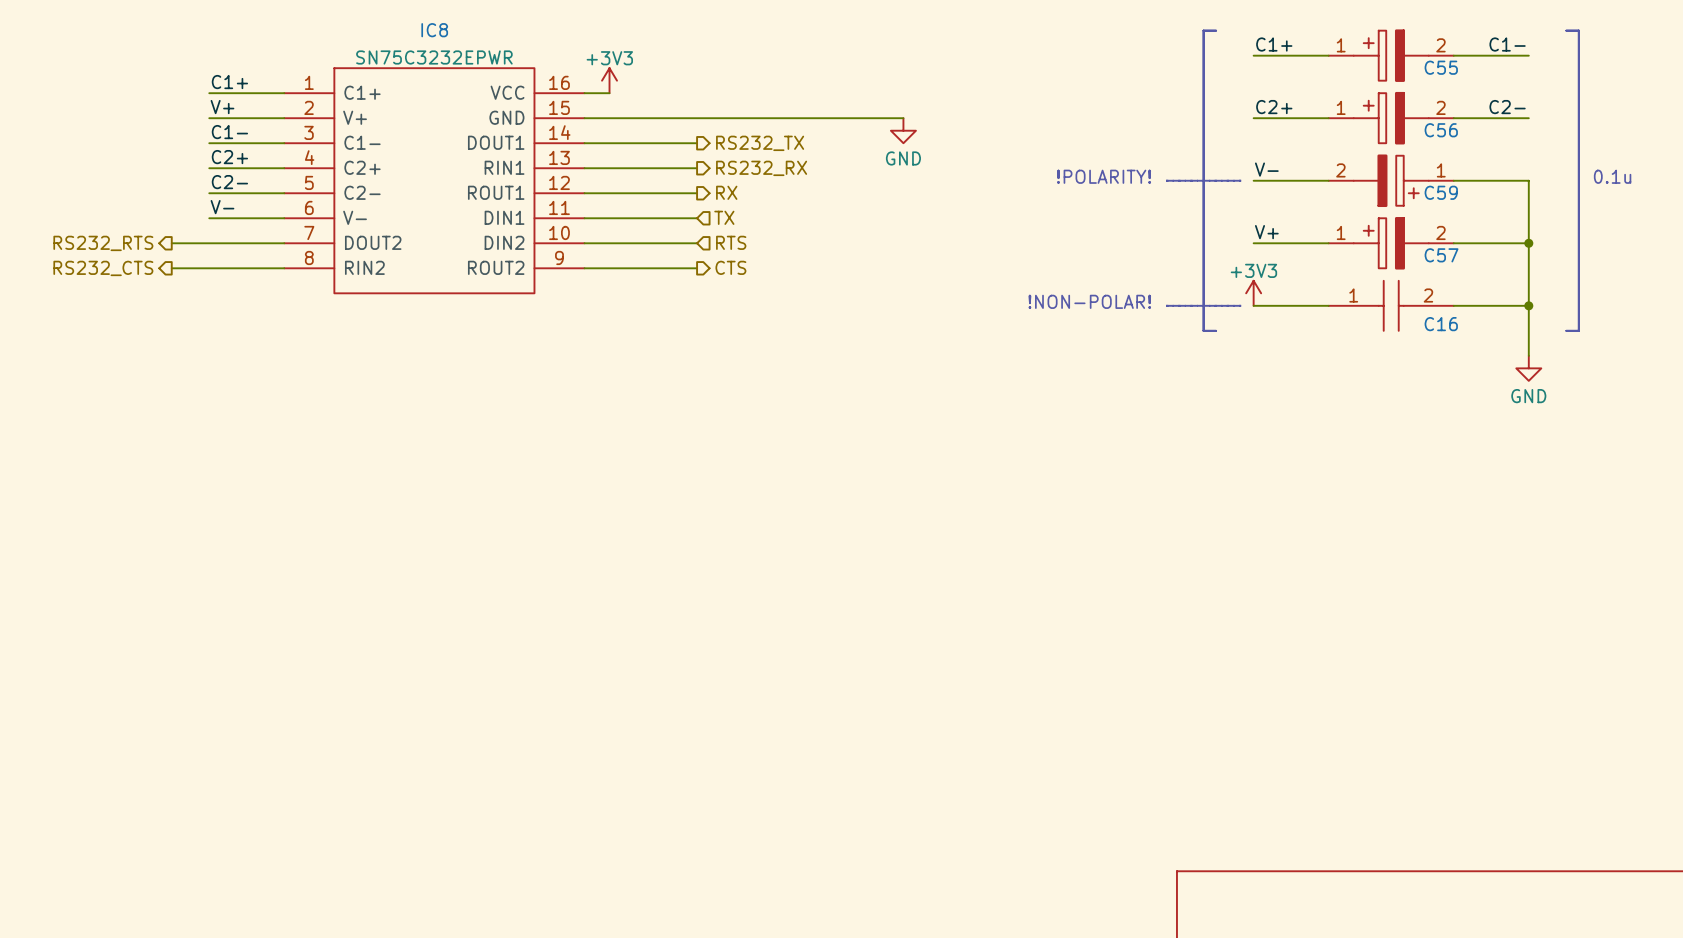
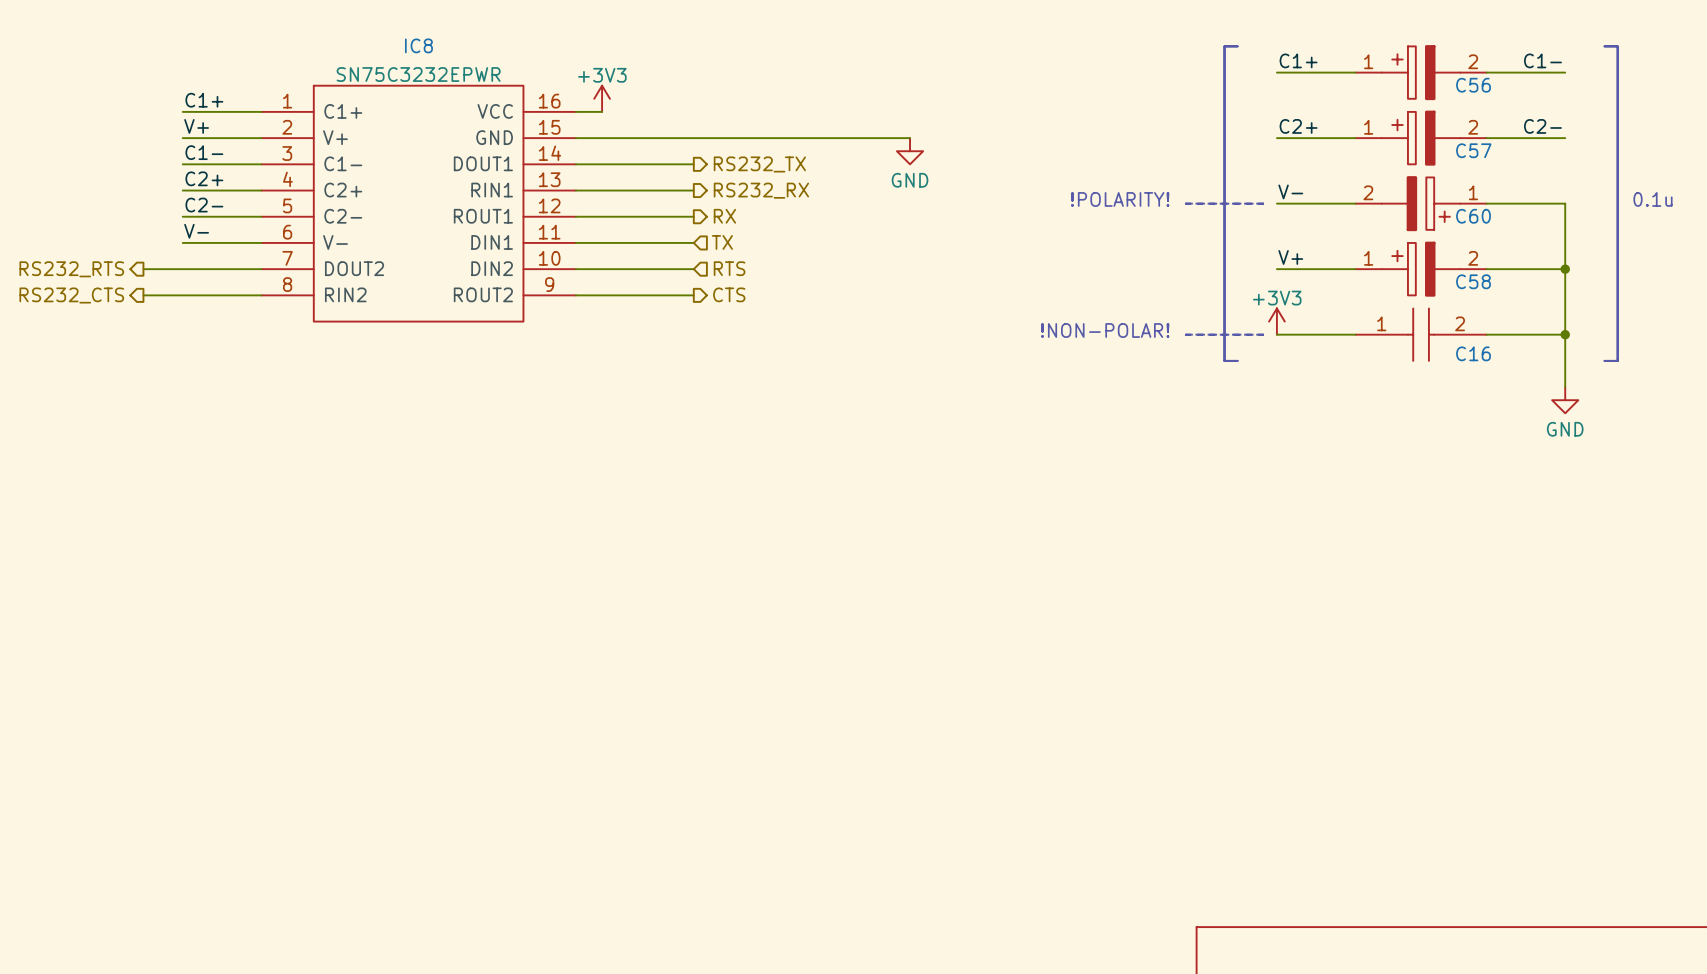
C55 name: C55 (1441, 67) -> C56 (1473, 85)
C56 name: C56 (1441, 130) -> C57 (1473, 150)
C59 name: C59 (1441, 192) -> C60 (1473, 216)
C57 name: C57 (1441, 255) -> C58 (1473, 281)

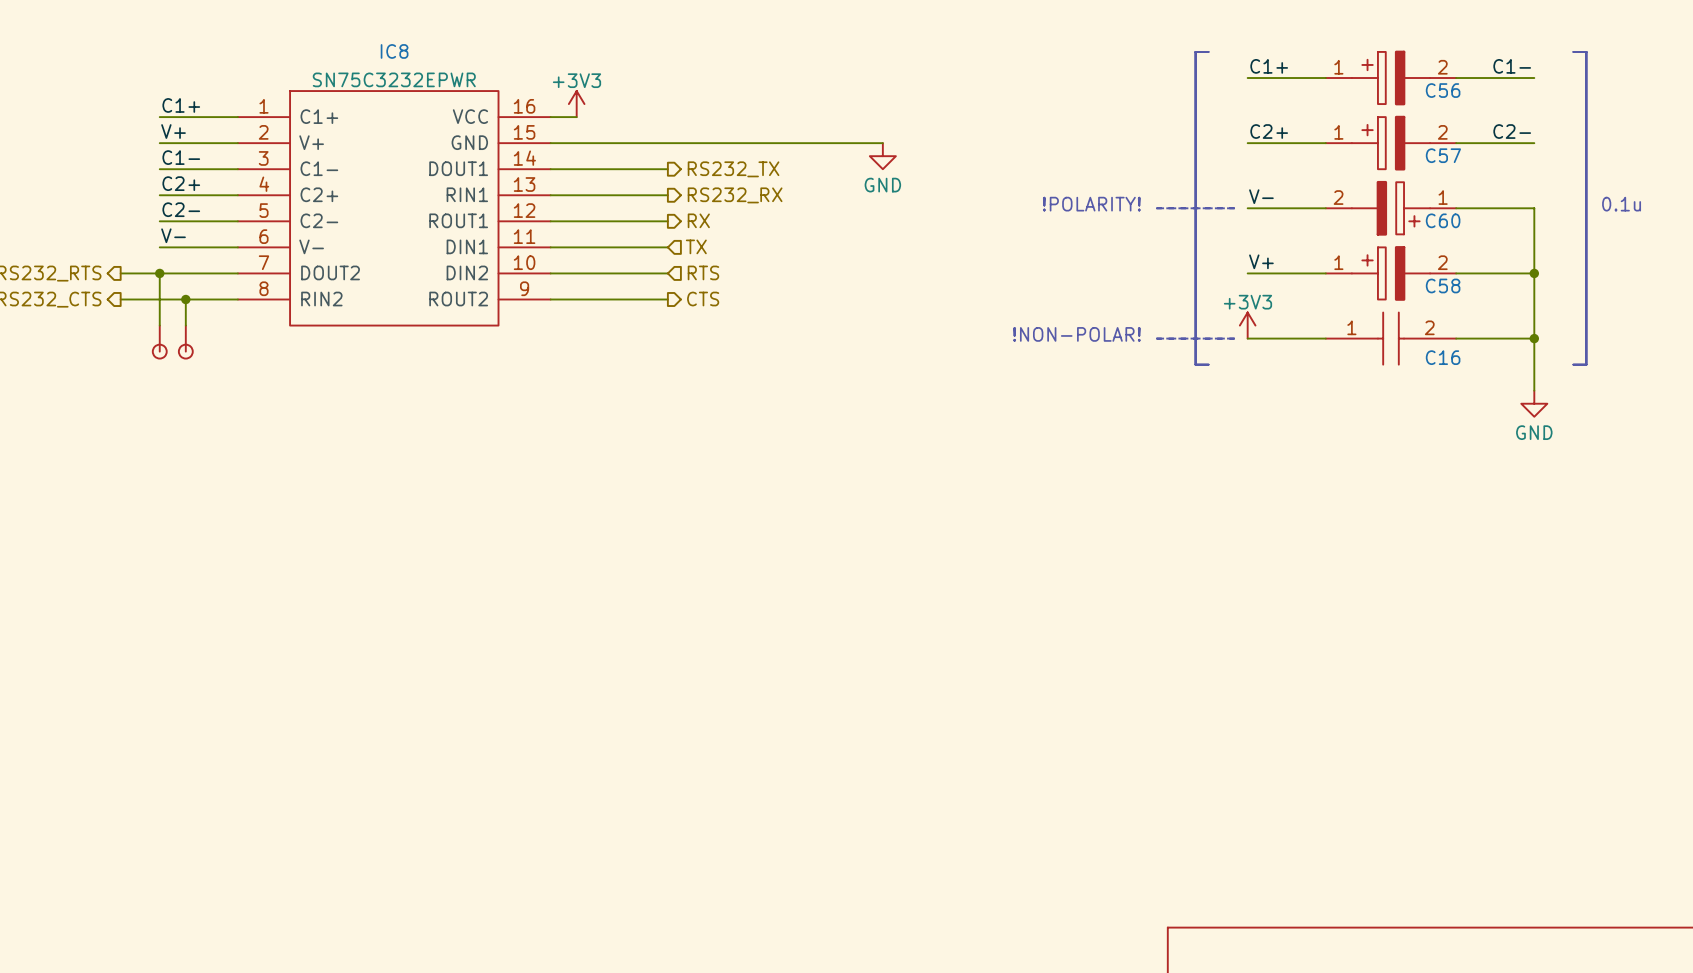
wire: none -> (159, 273) (159, 325)
junction: none -> (159, 273)
wire: none -> (185, 299) (185, 325)
junction: none -> (185, 299)
part: none -> (159, 342)
part: none -> (185, 342)

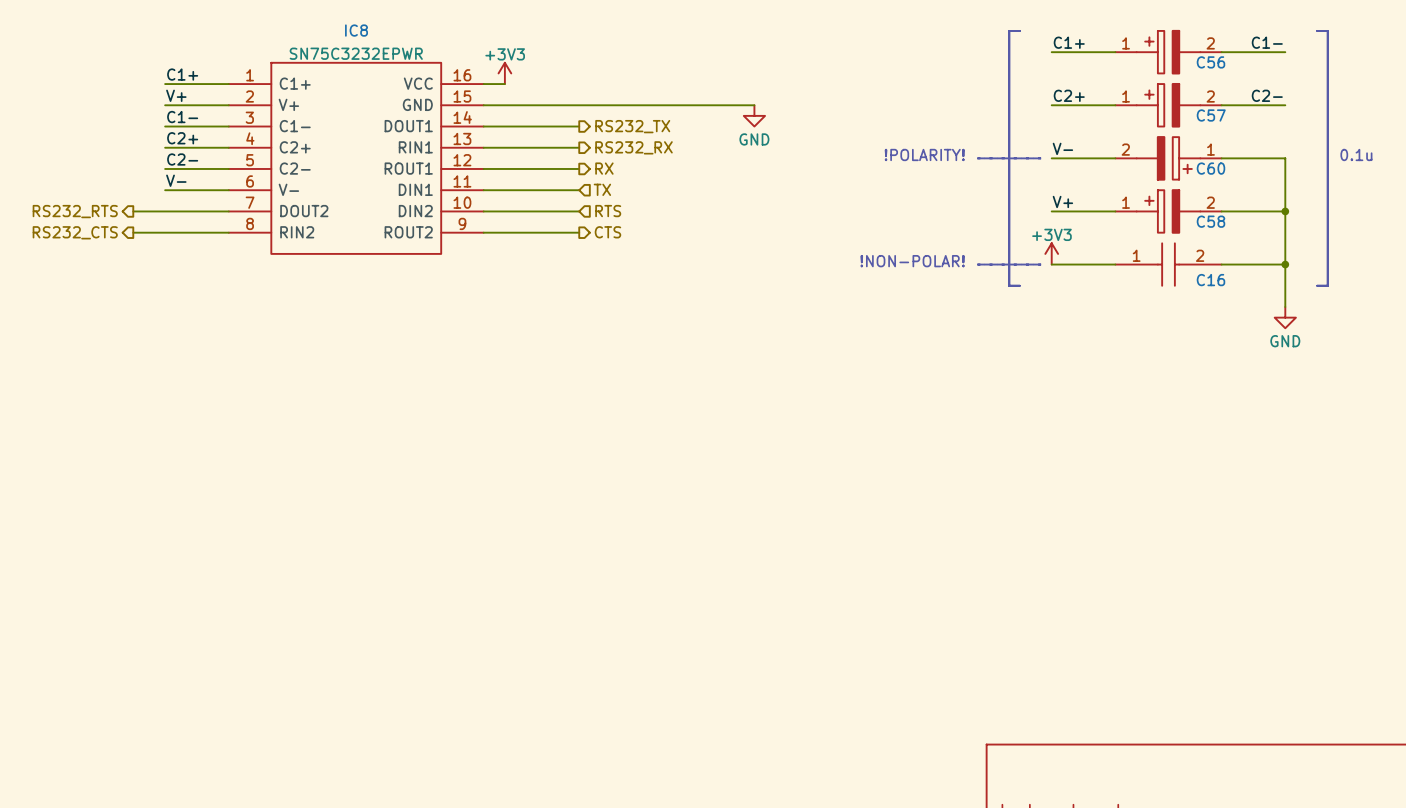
wire: (159, 273) (159, 325) -> none
junction: (159, 273) -> none
wire: (185, 299) (185, 325) -> none
junction: (185, 299) -> none
part: (159, 342) -> none
part: (185, 342) -> none

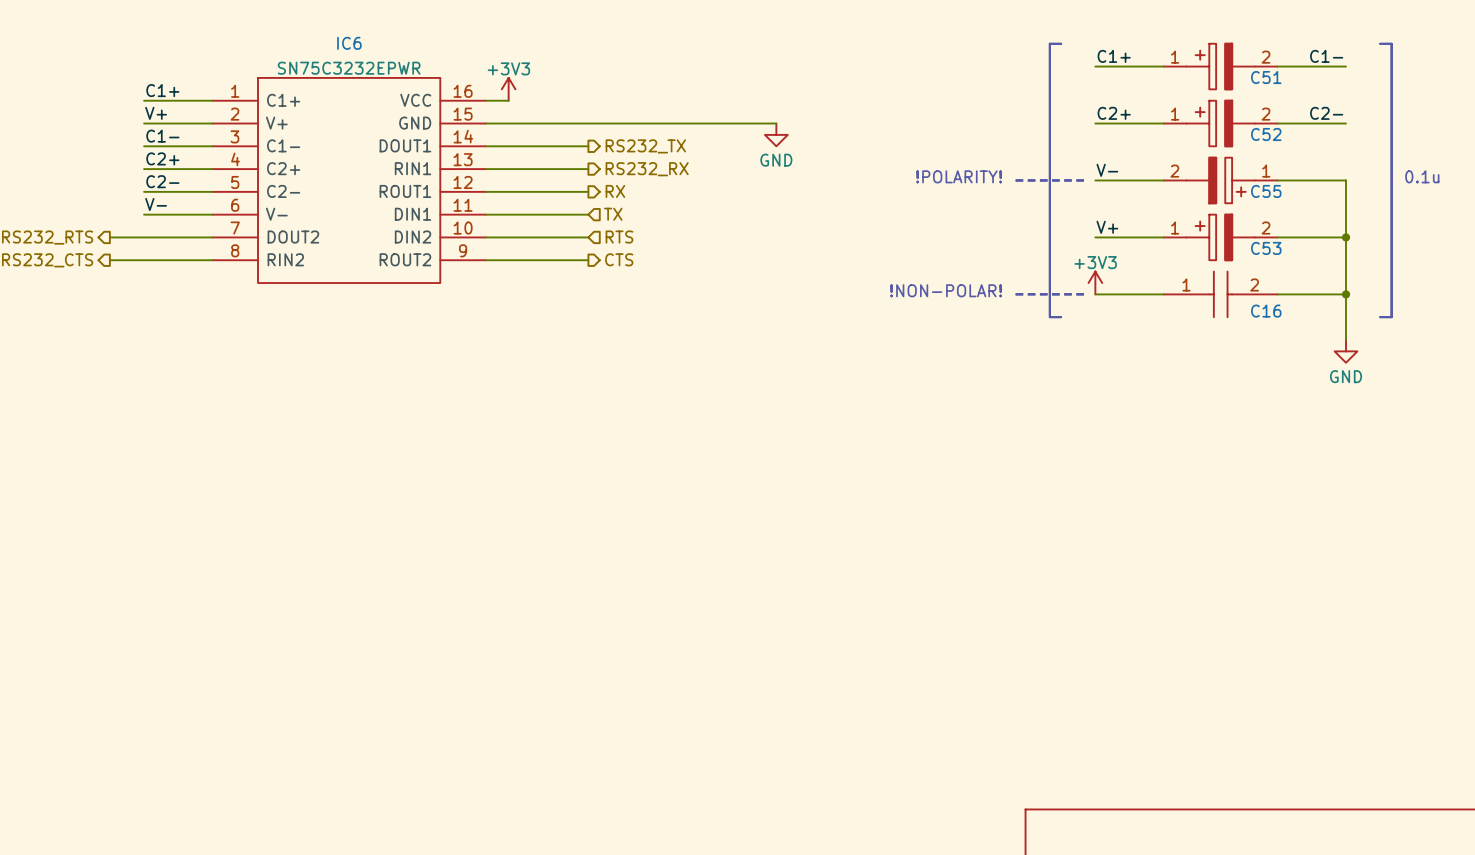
IC8 name: IC8 (356, 30) -> IC6 (349, 43)
C56 name: C56 (1210, 62) -> C51 (1266, 77)
C57 name: C57 (1211, 115) -> C52 (1266, 134)
C60 name: C60 (1210, 168) -> C55 (1266, 191)
C58 name: C58 (1210, 221) -> C53 (1266, 248)

